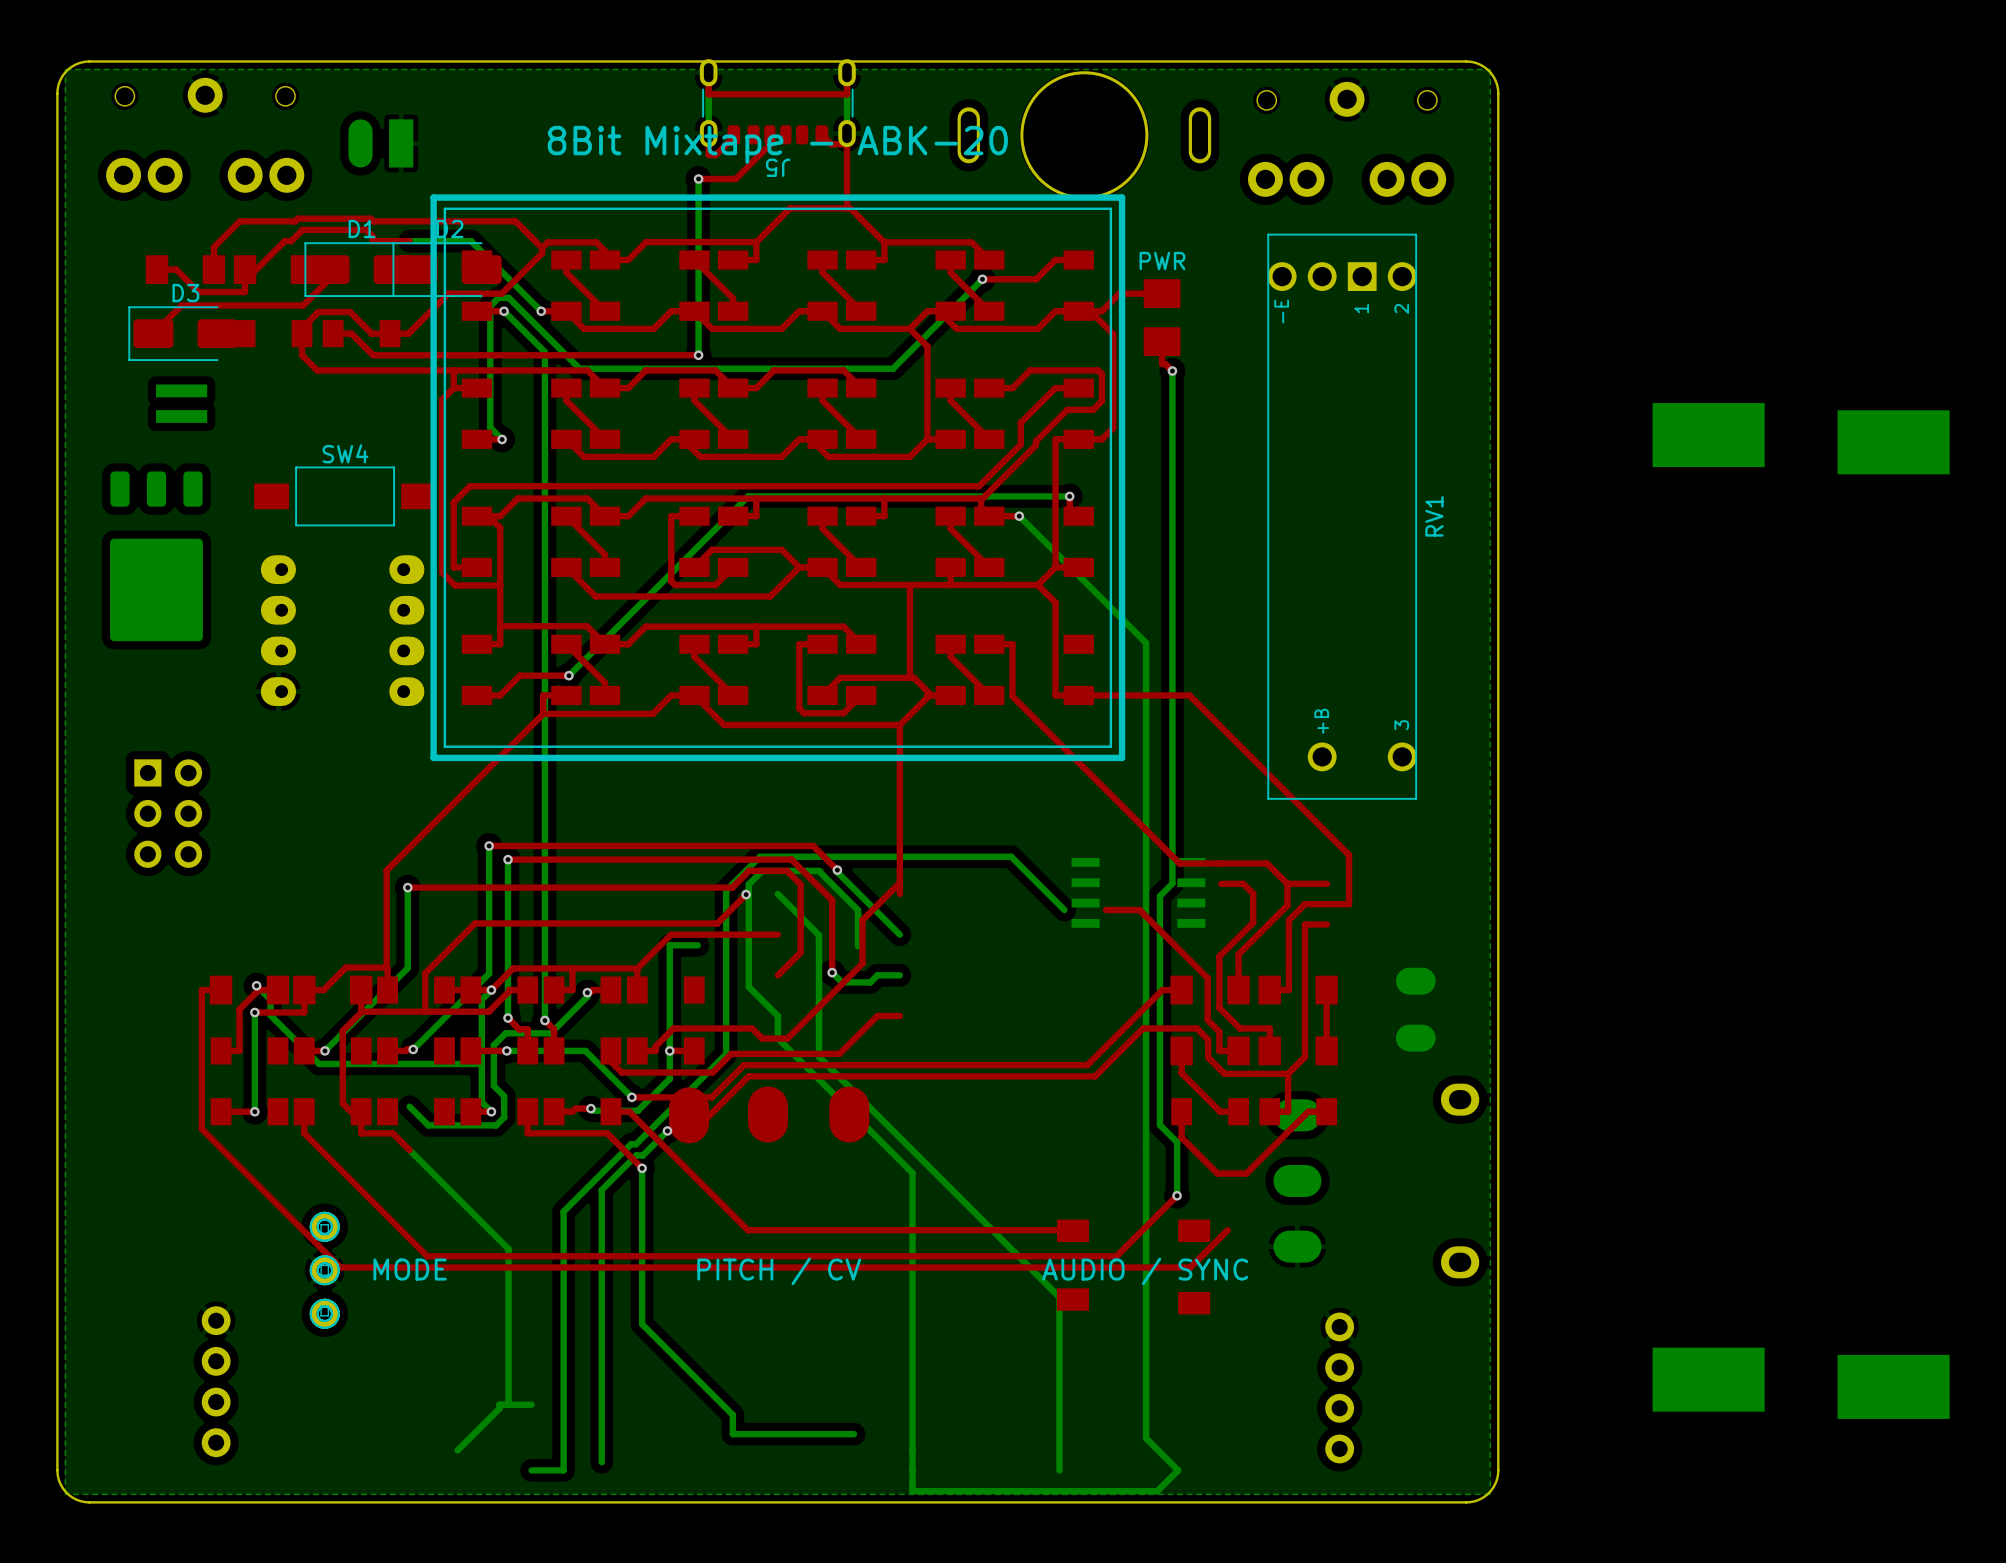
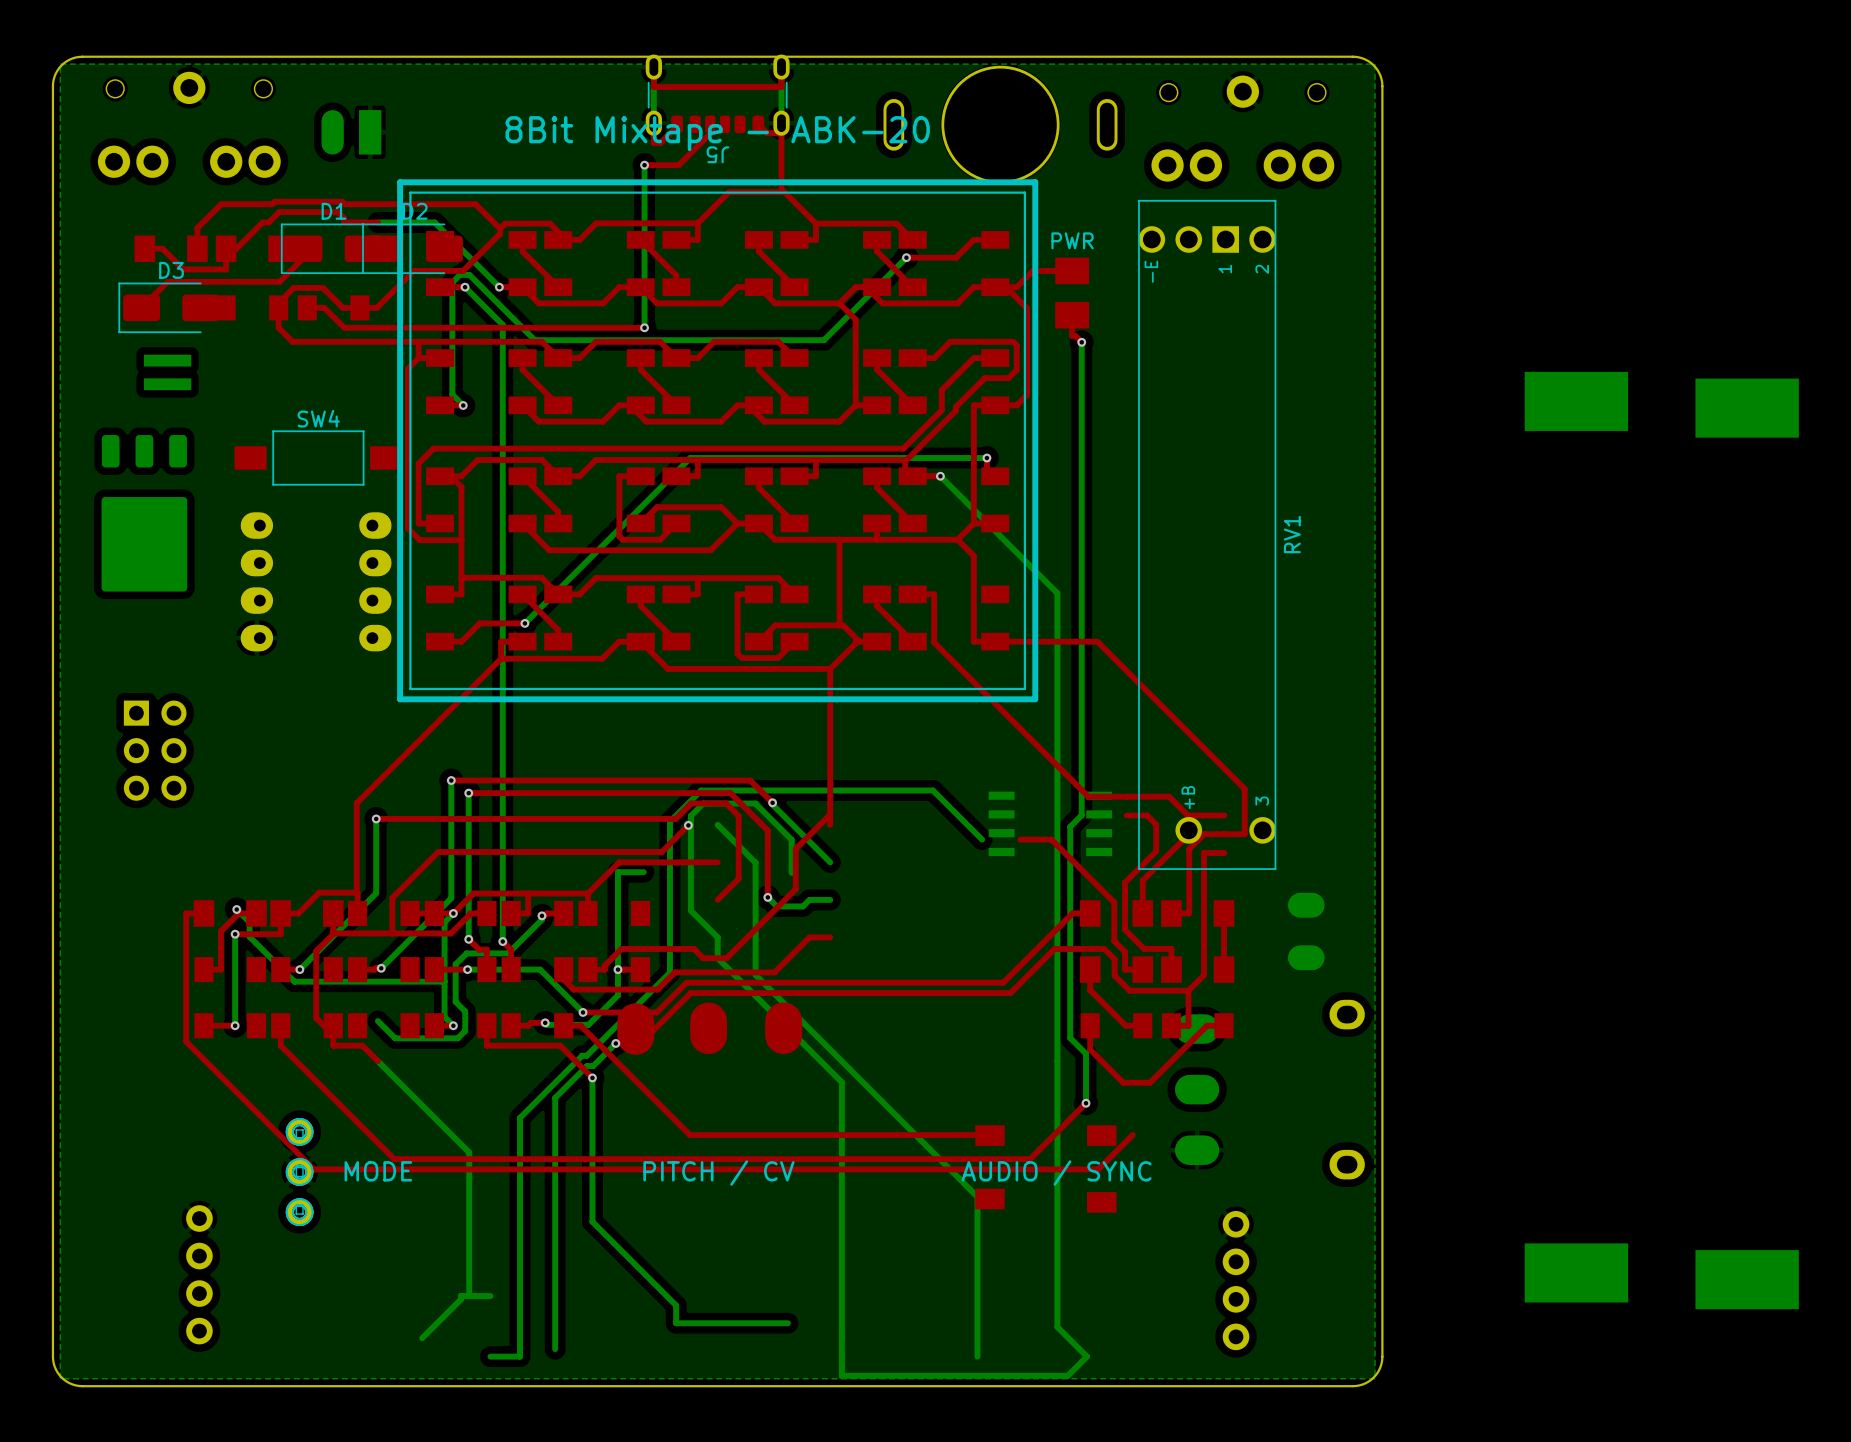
RV1 footprint: [1267, 233, 1418, 800] -> [1138, 199, 1277, 870]

